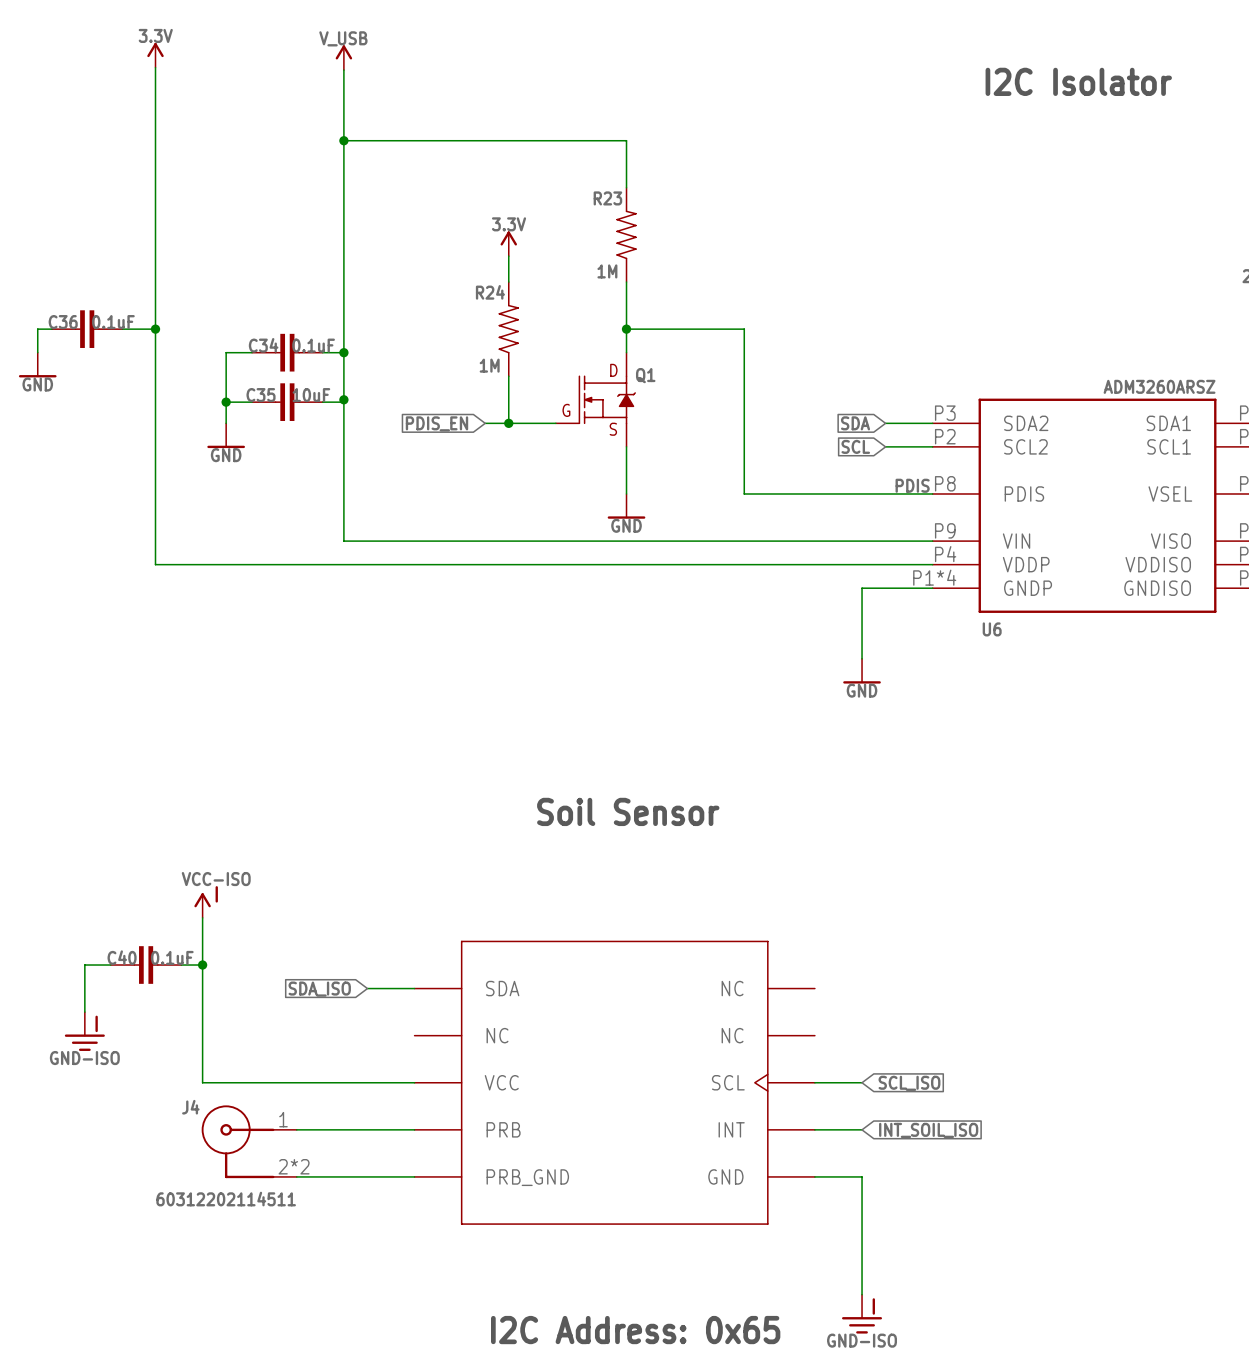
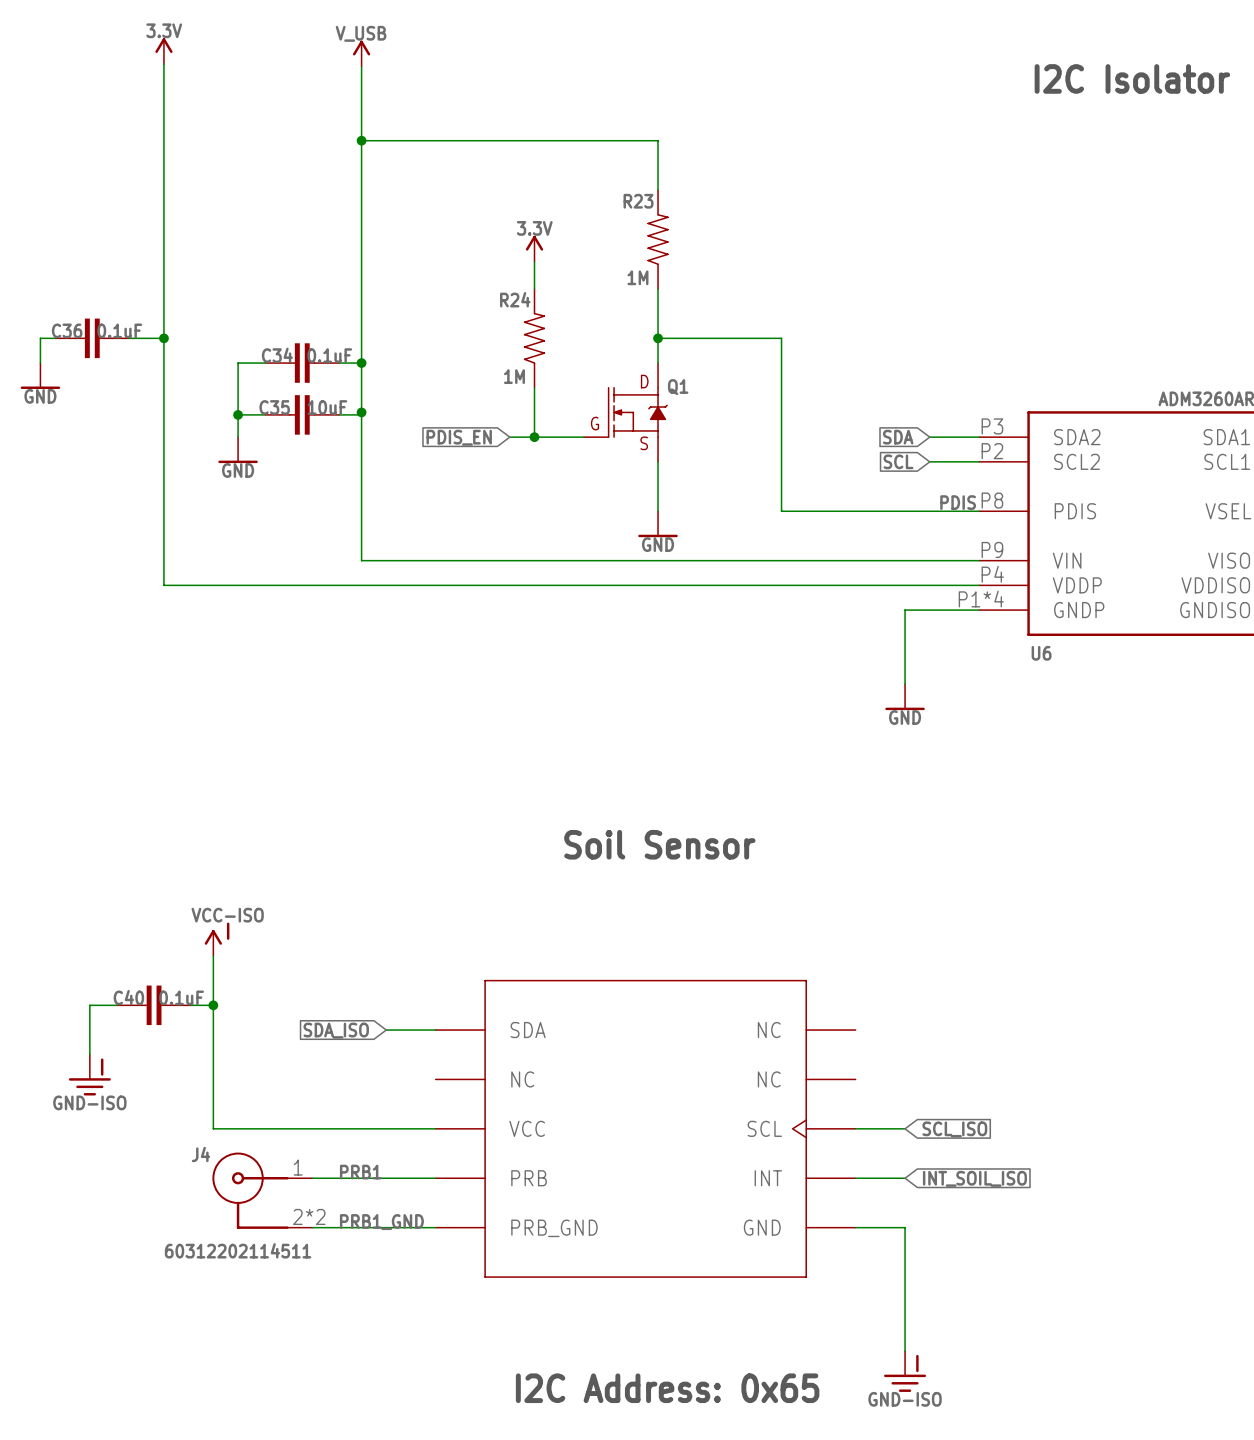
label: none -> PRB1 (360, 1172)
label: none -> PRB1_GND (381, 1222)

